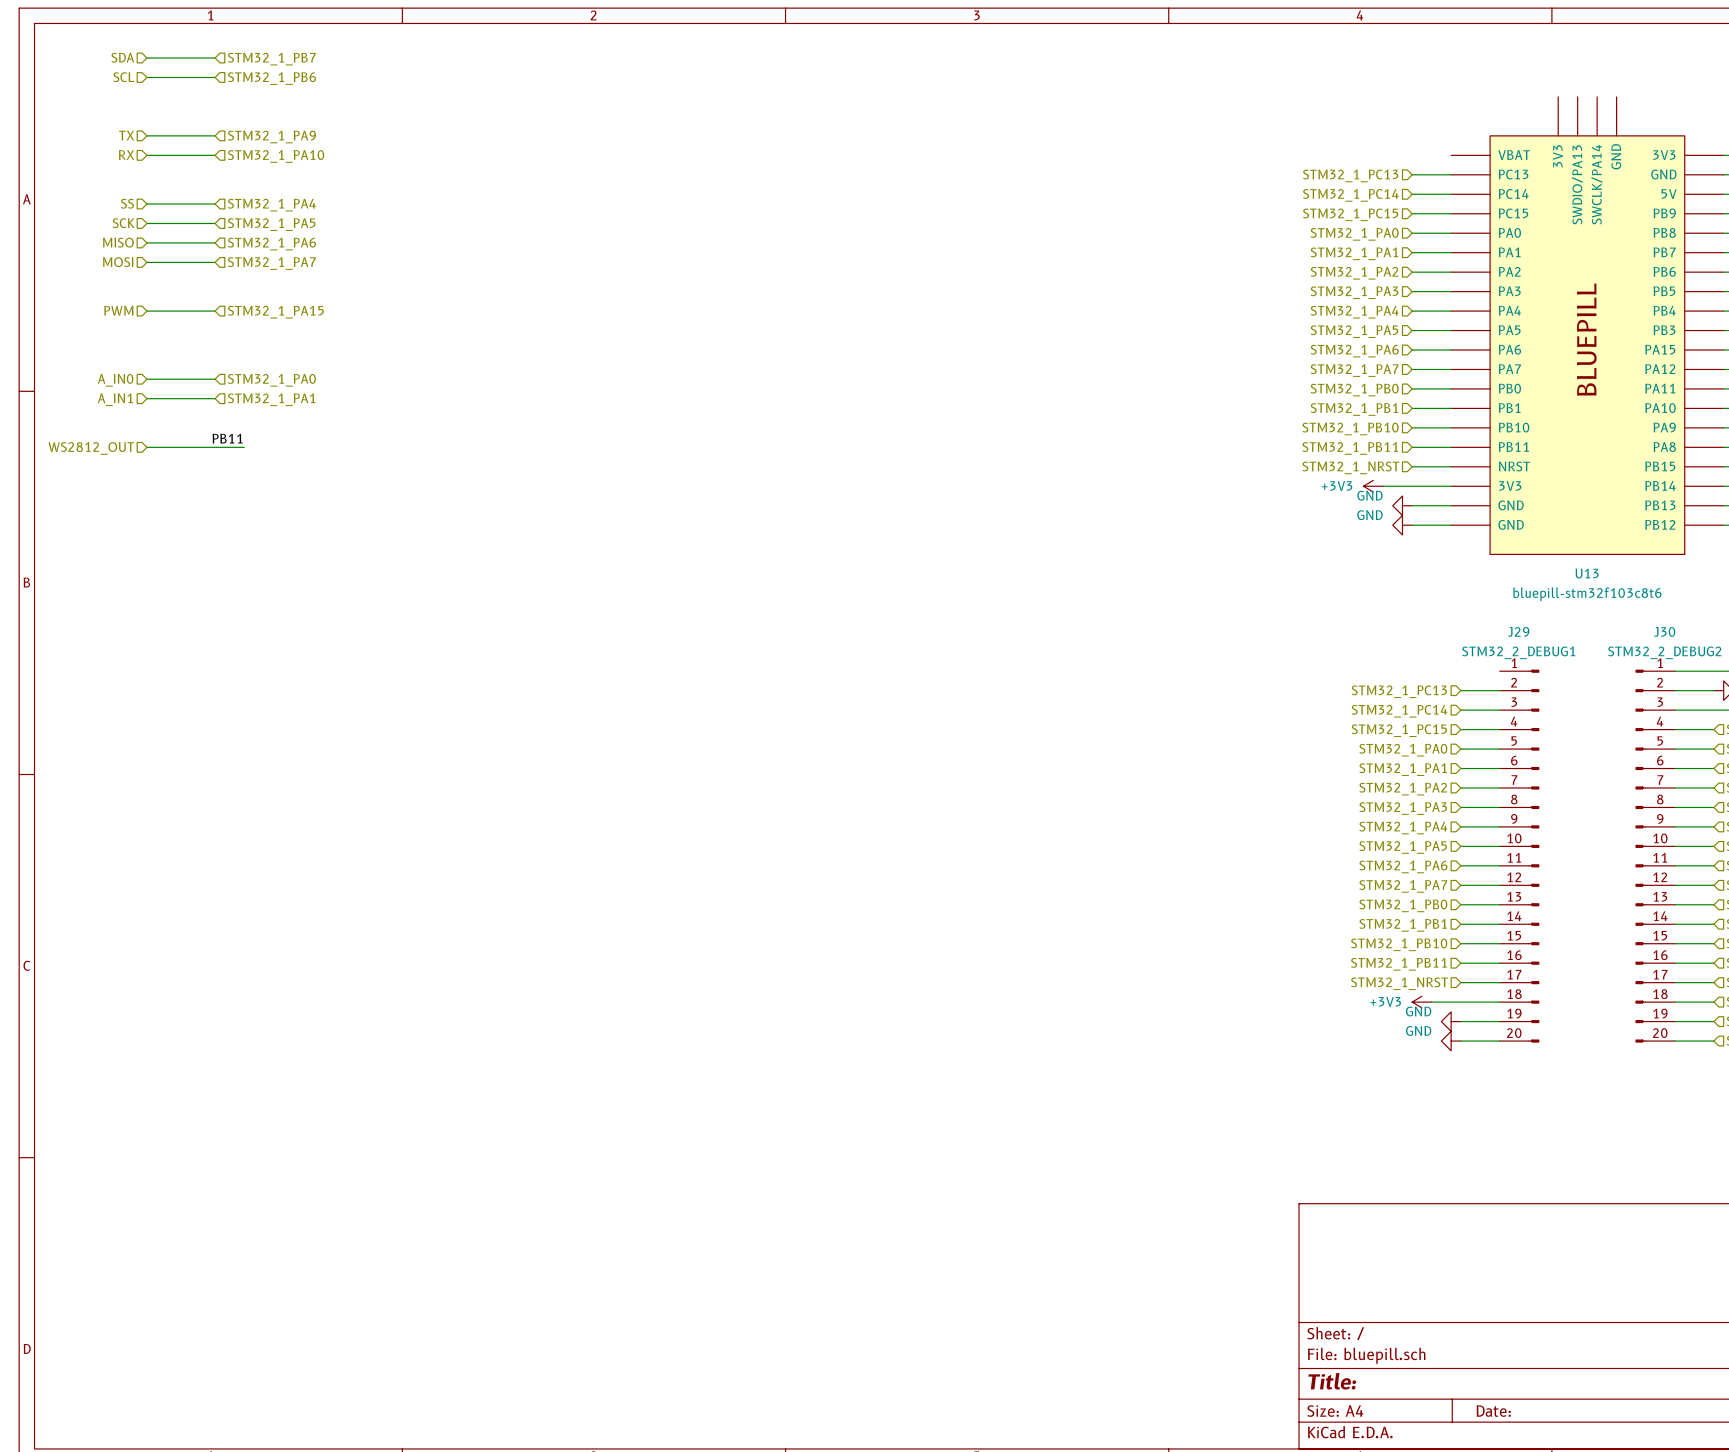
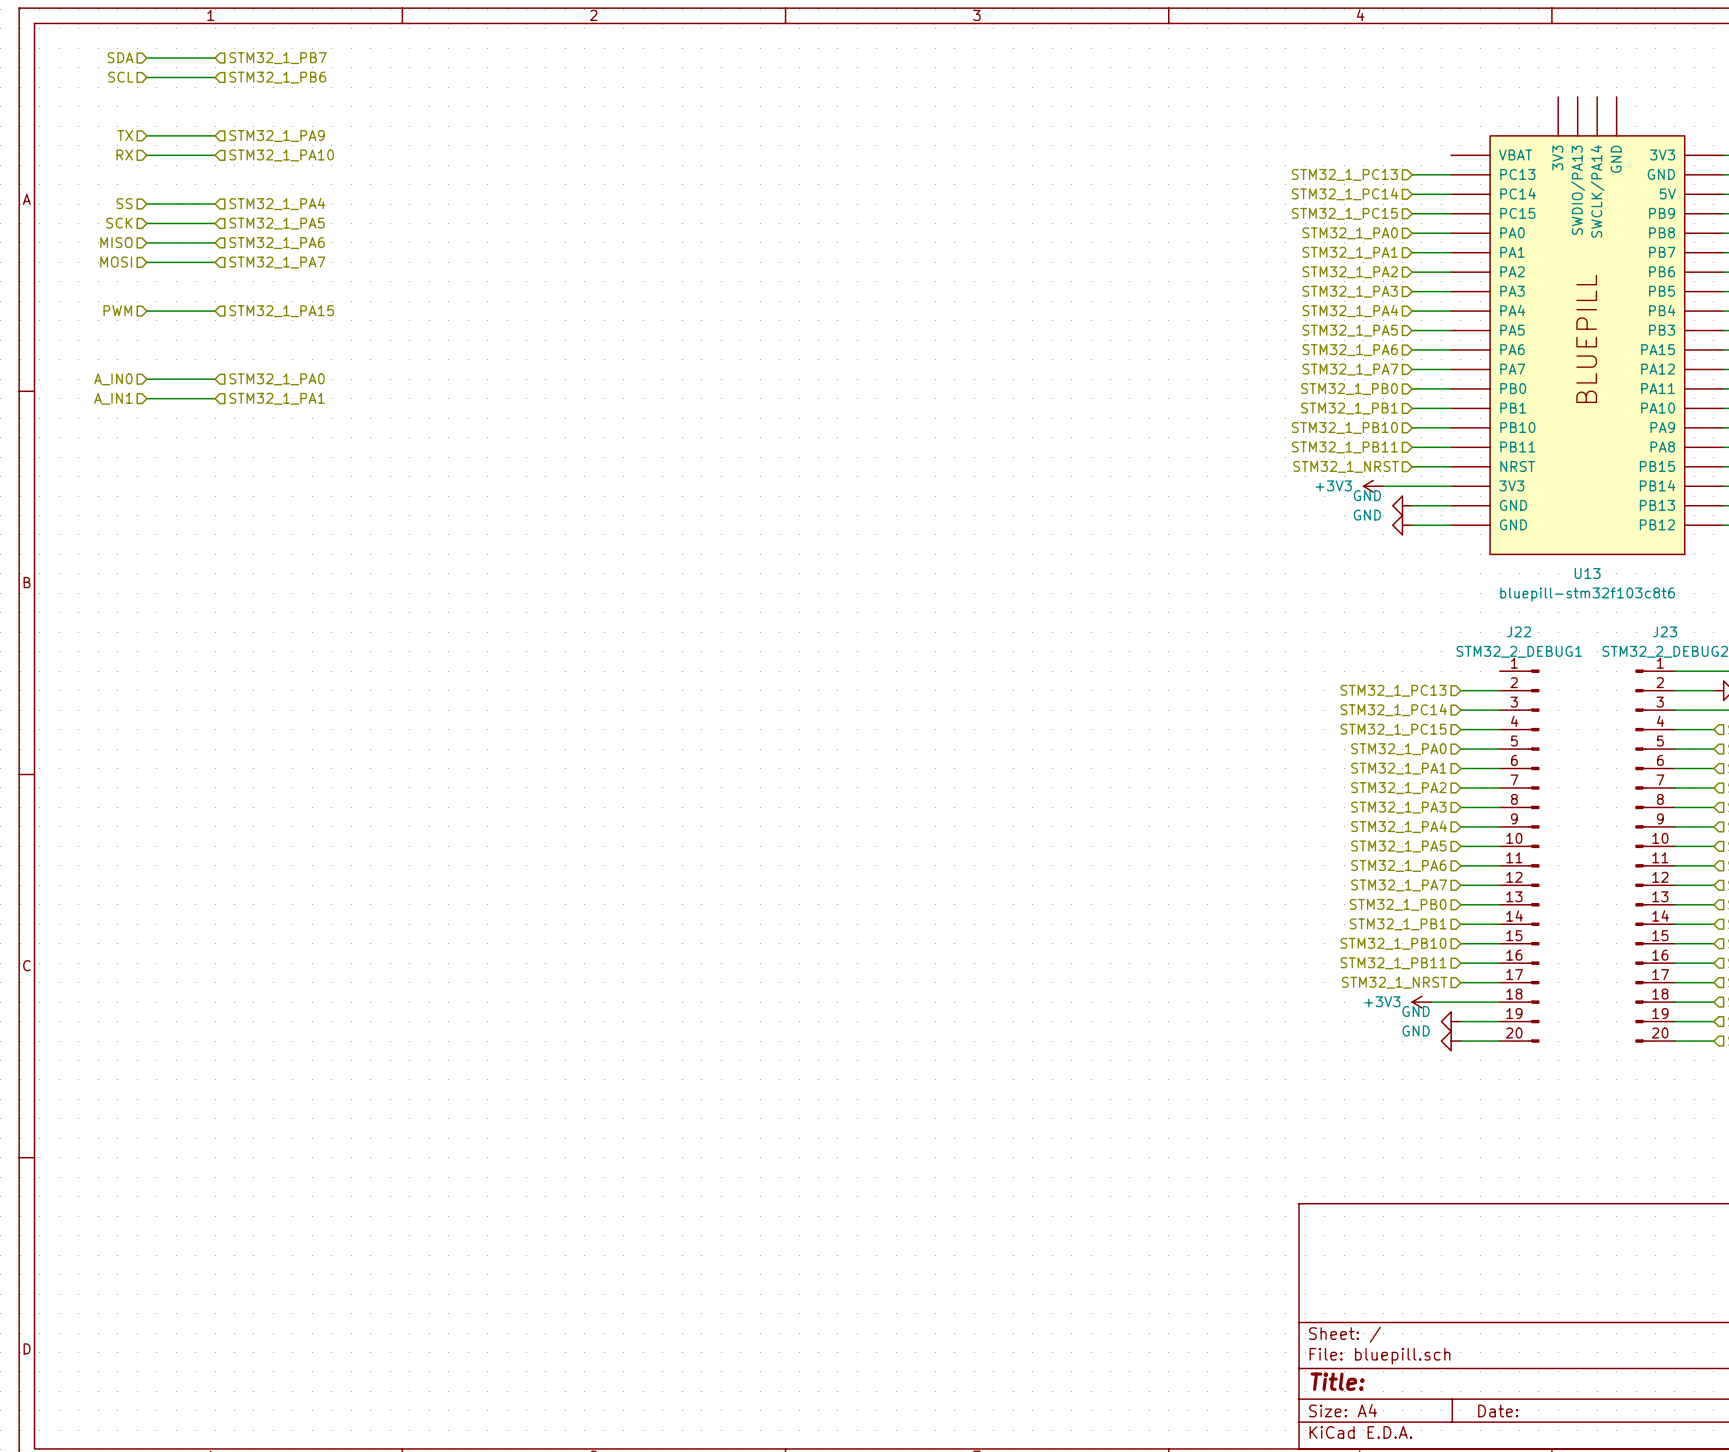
label: PB11 (227, 438) -> none
wire: (146, 447) (244, 447) -> none
hierarchical label: WS2812_OUT (91, 448) -> none
J29 name: J29 (1518, 631) -> J22 (1519, 631)
J30 name: J30 (1664, 631) -> J23 (1665, 631)

